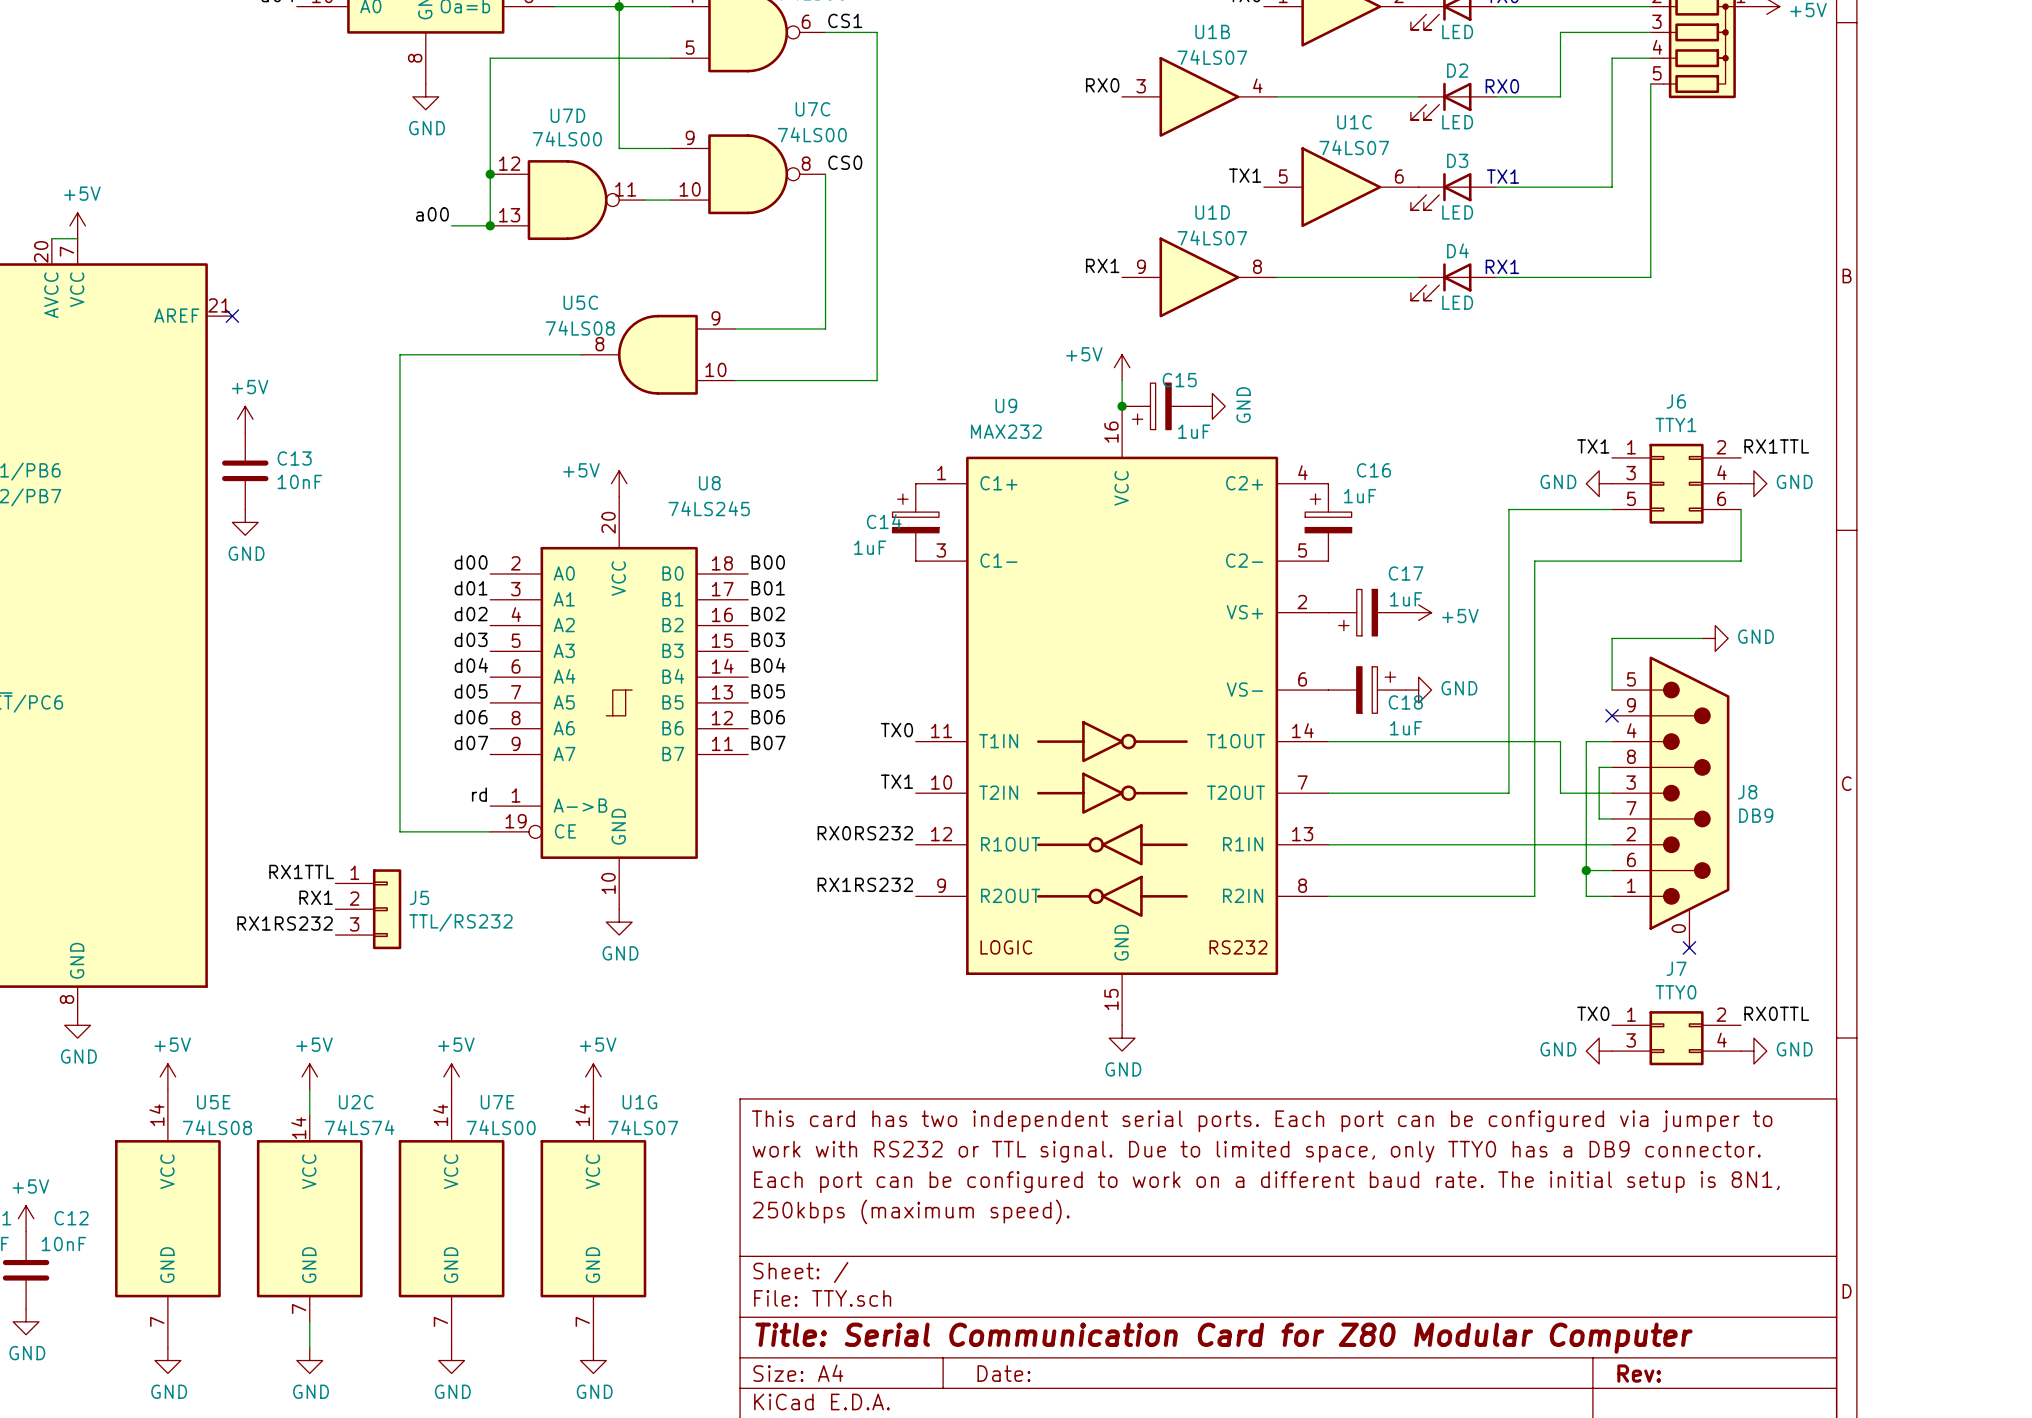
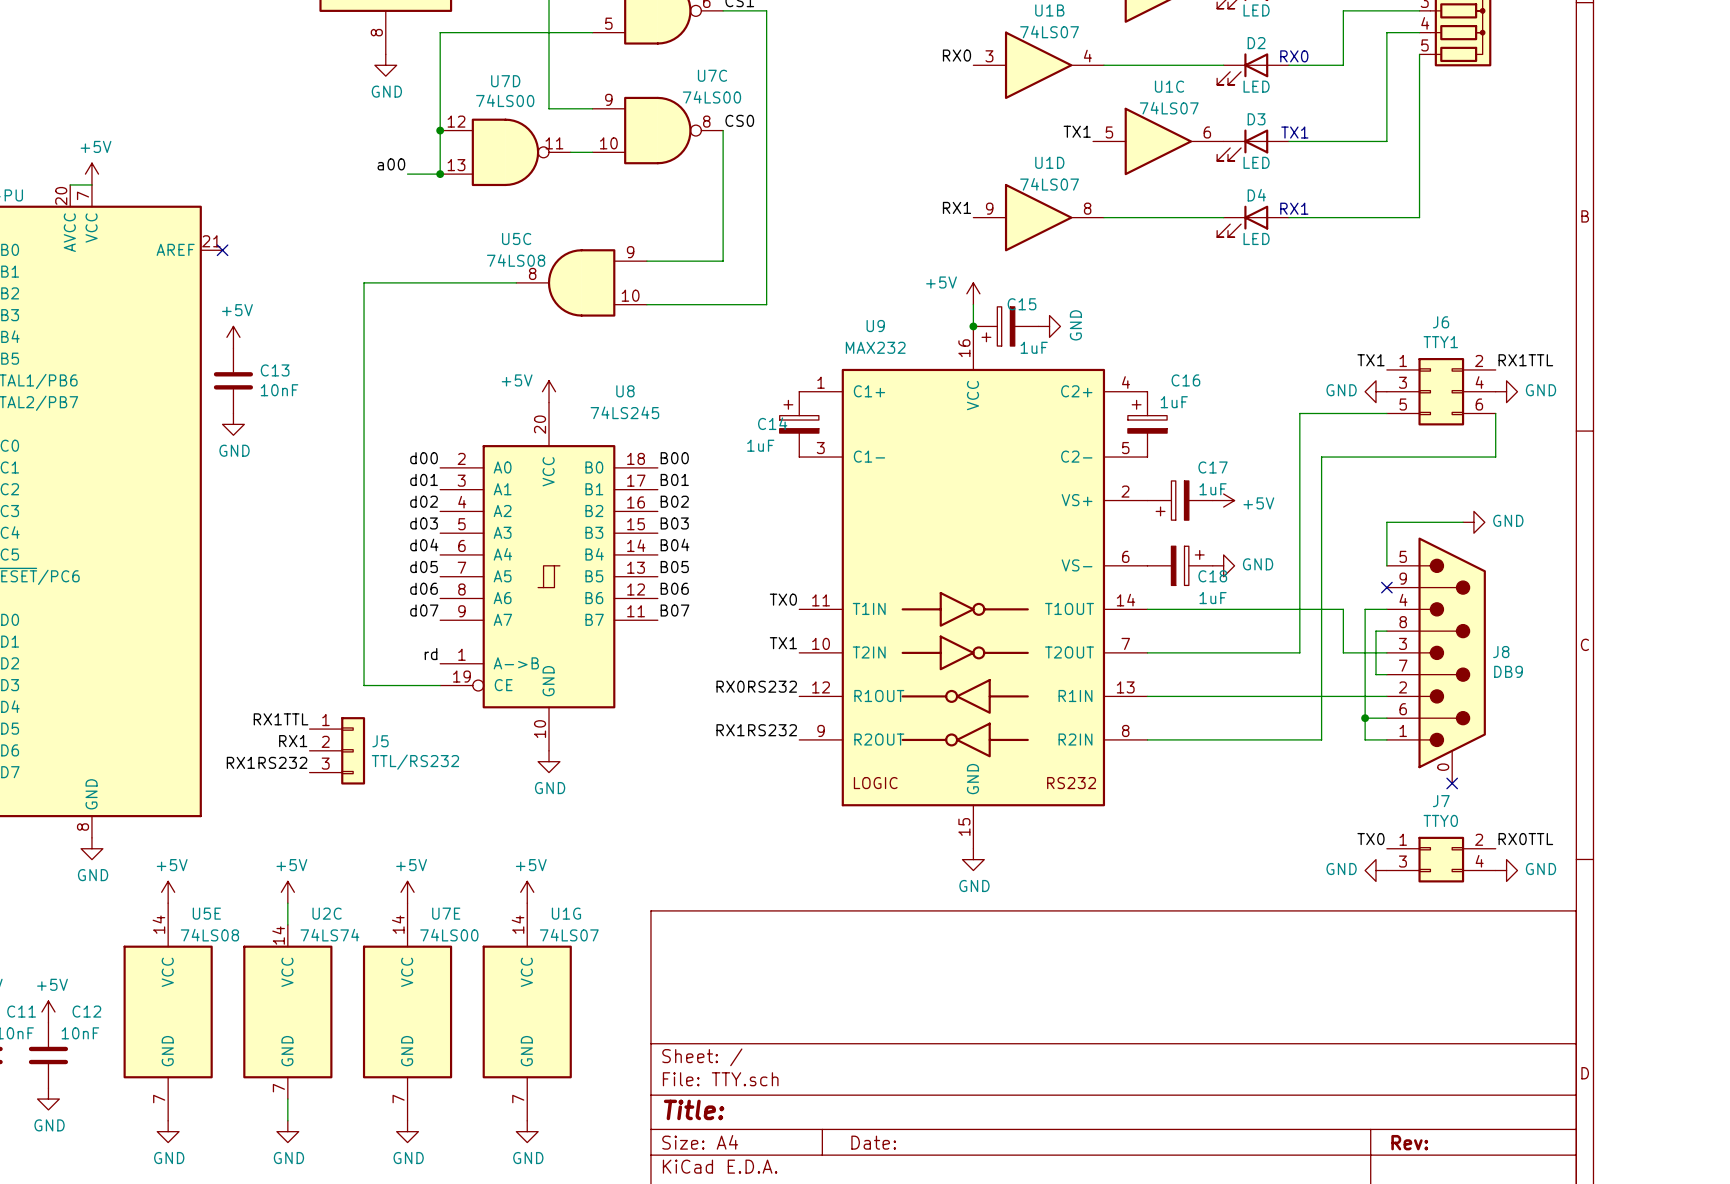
title block: This card has two independent serial ports. Each port can be configured via jumper to (1262, 1121) -> none
title block: work with RS232 or TTL signal. Due to limited space, only TTY0 has a DB9 connector. (1256, 1151) -> none
title block: Each port can be configured to work on a different baud rate. The initial setup is 8N1, (1266, 1182) -> none
title block: 250kbps (maximum speed). (911, 1211) -> none
title block: Title: Serial Communication Card for Z80 Modular Computer (1223, 1338) -> Title: (694, 1109)

